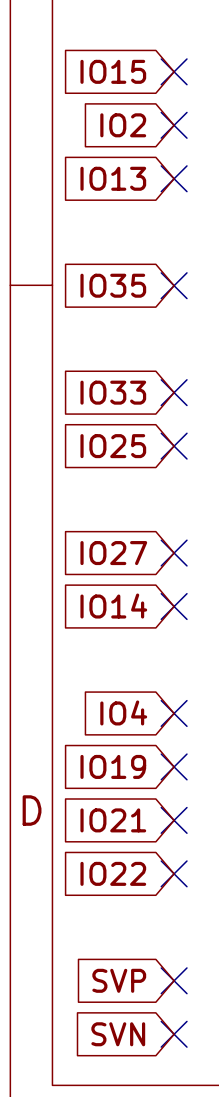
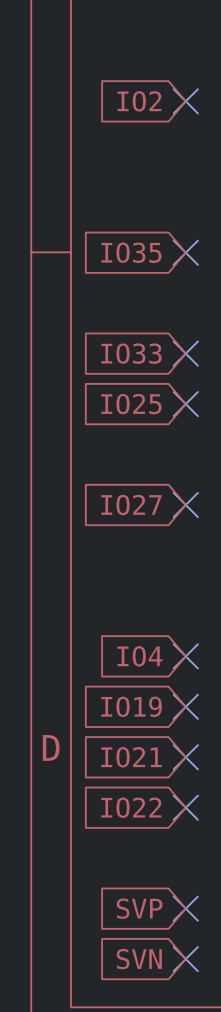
global label: IO15 (113, 71) -> none
no-connect mark: (174, 71) -> none
global label: IO13 (113, 178) -> none
no-connect mark: (174, 178) -> none
global label: IO14 (113, 606) -> none
no-connect mark: (174, 606) -> none

